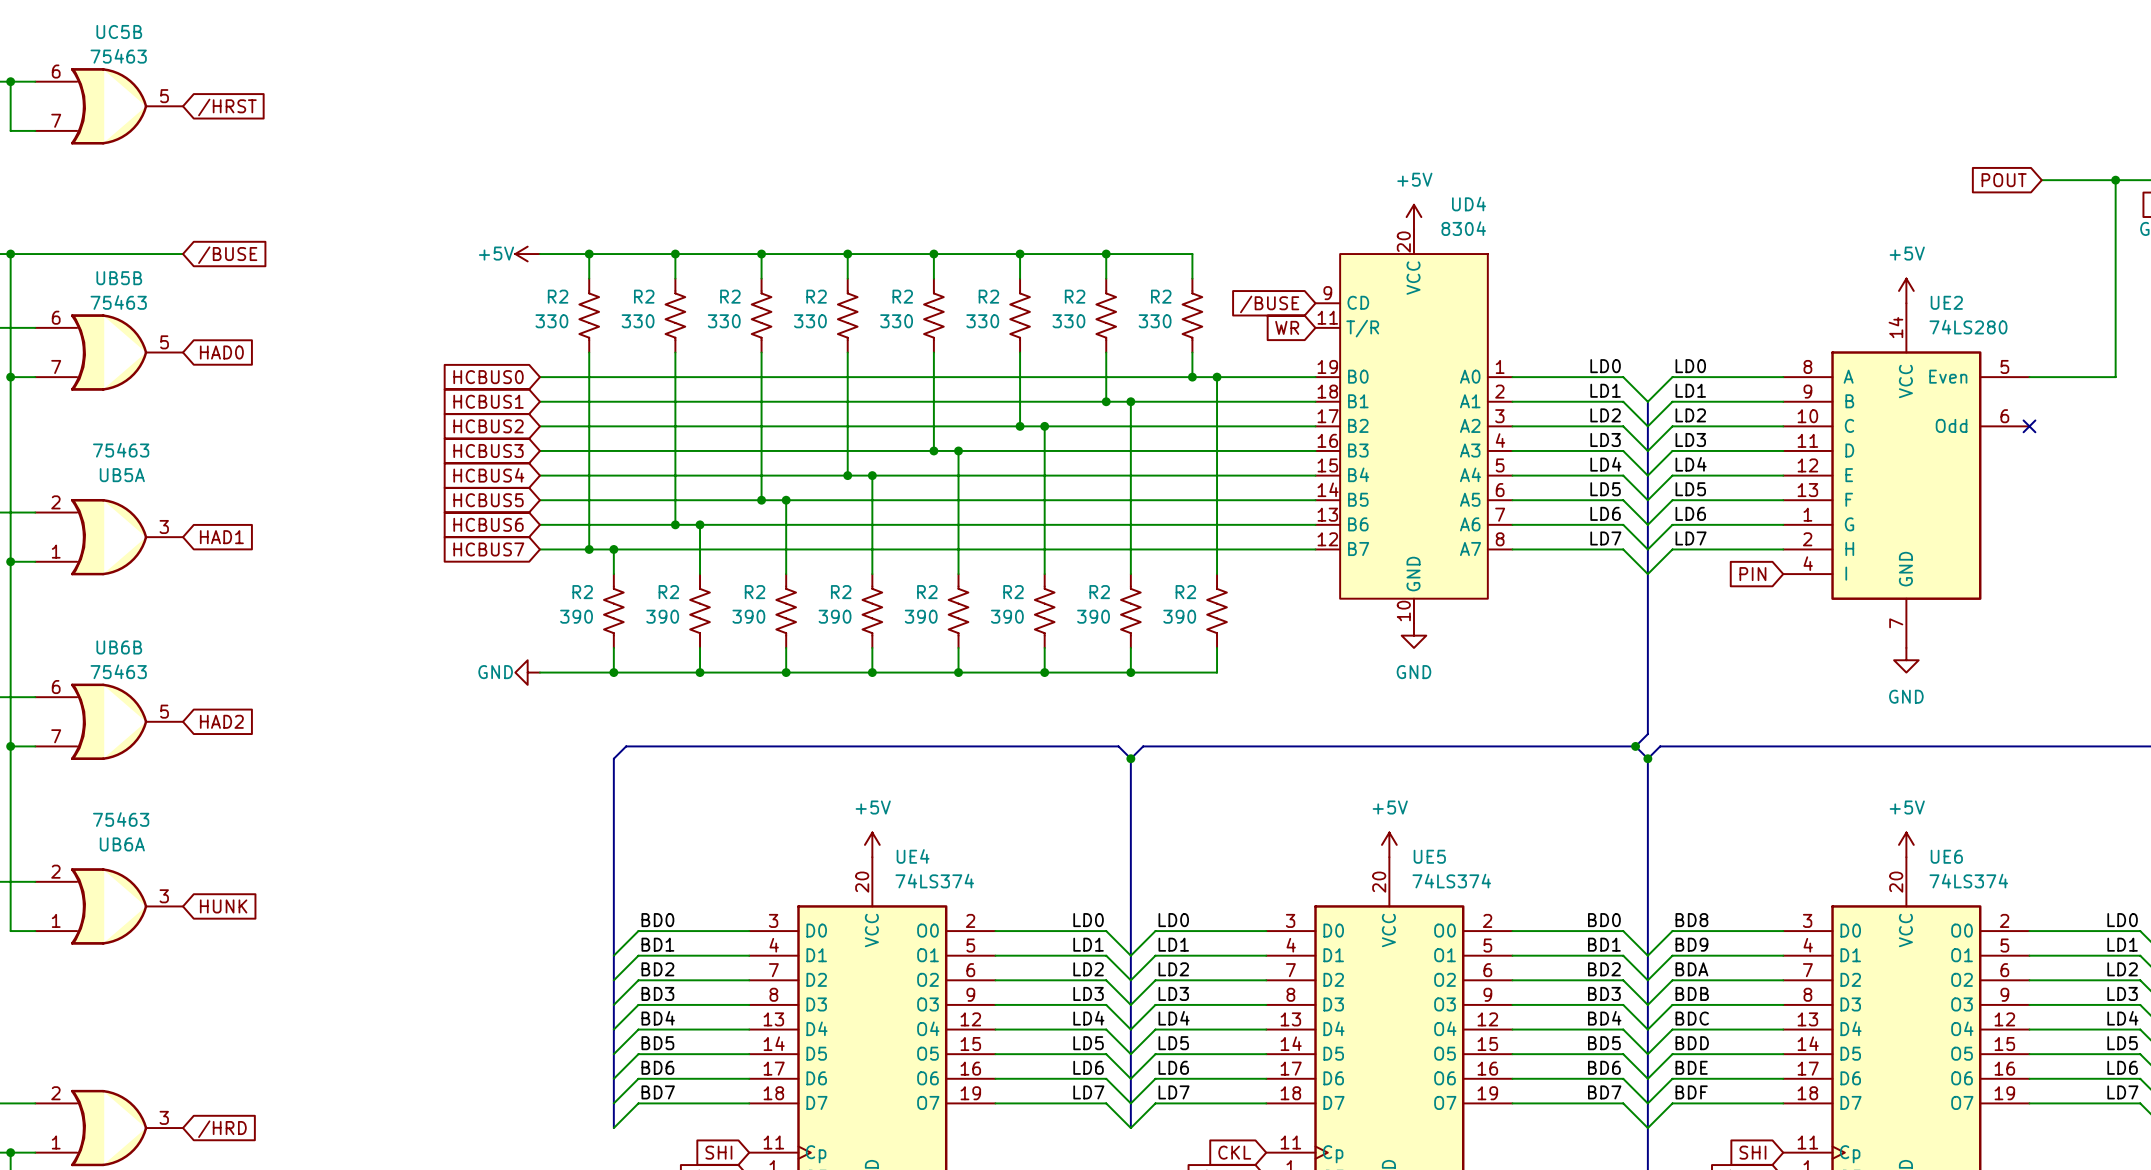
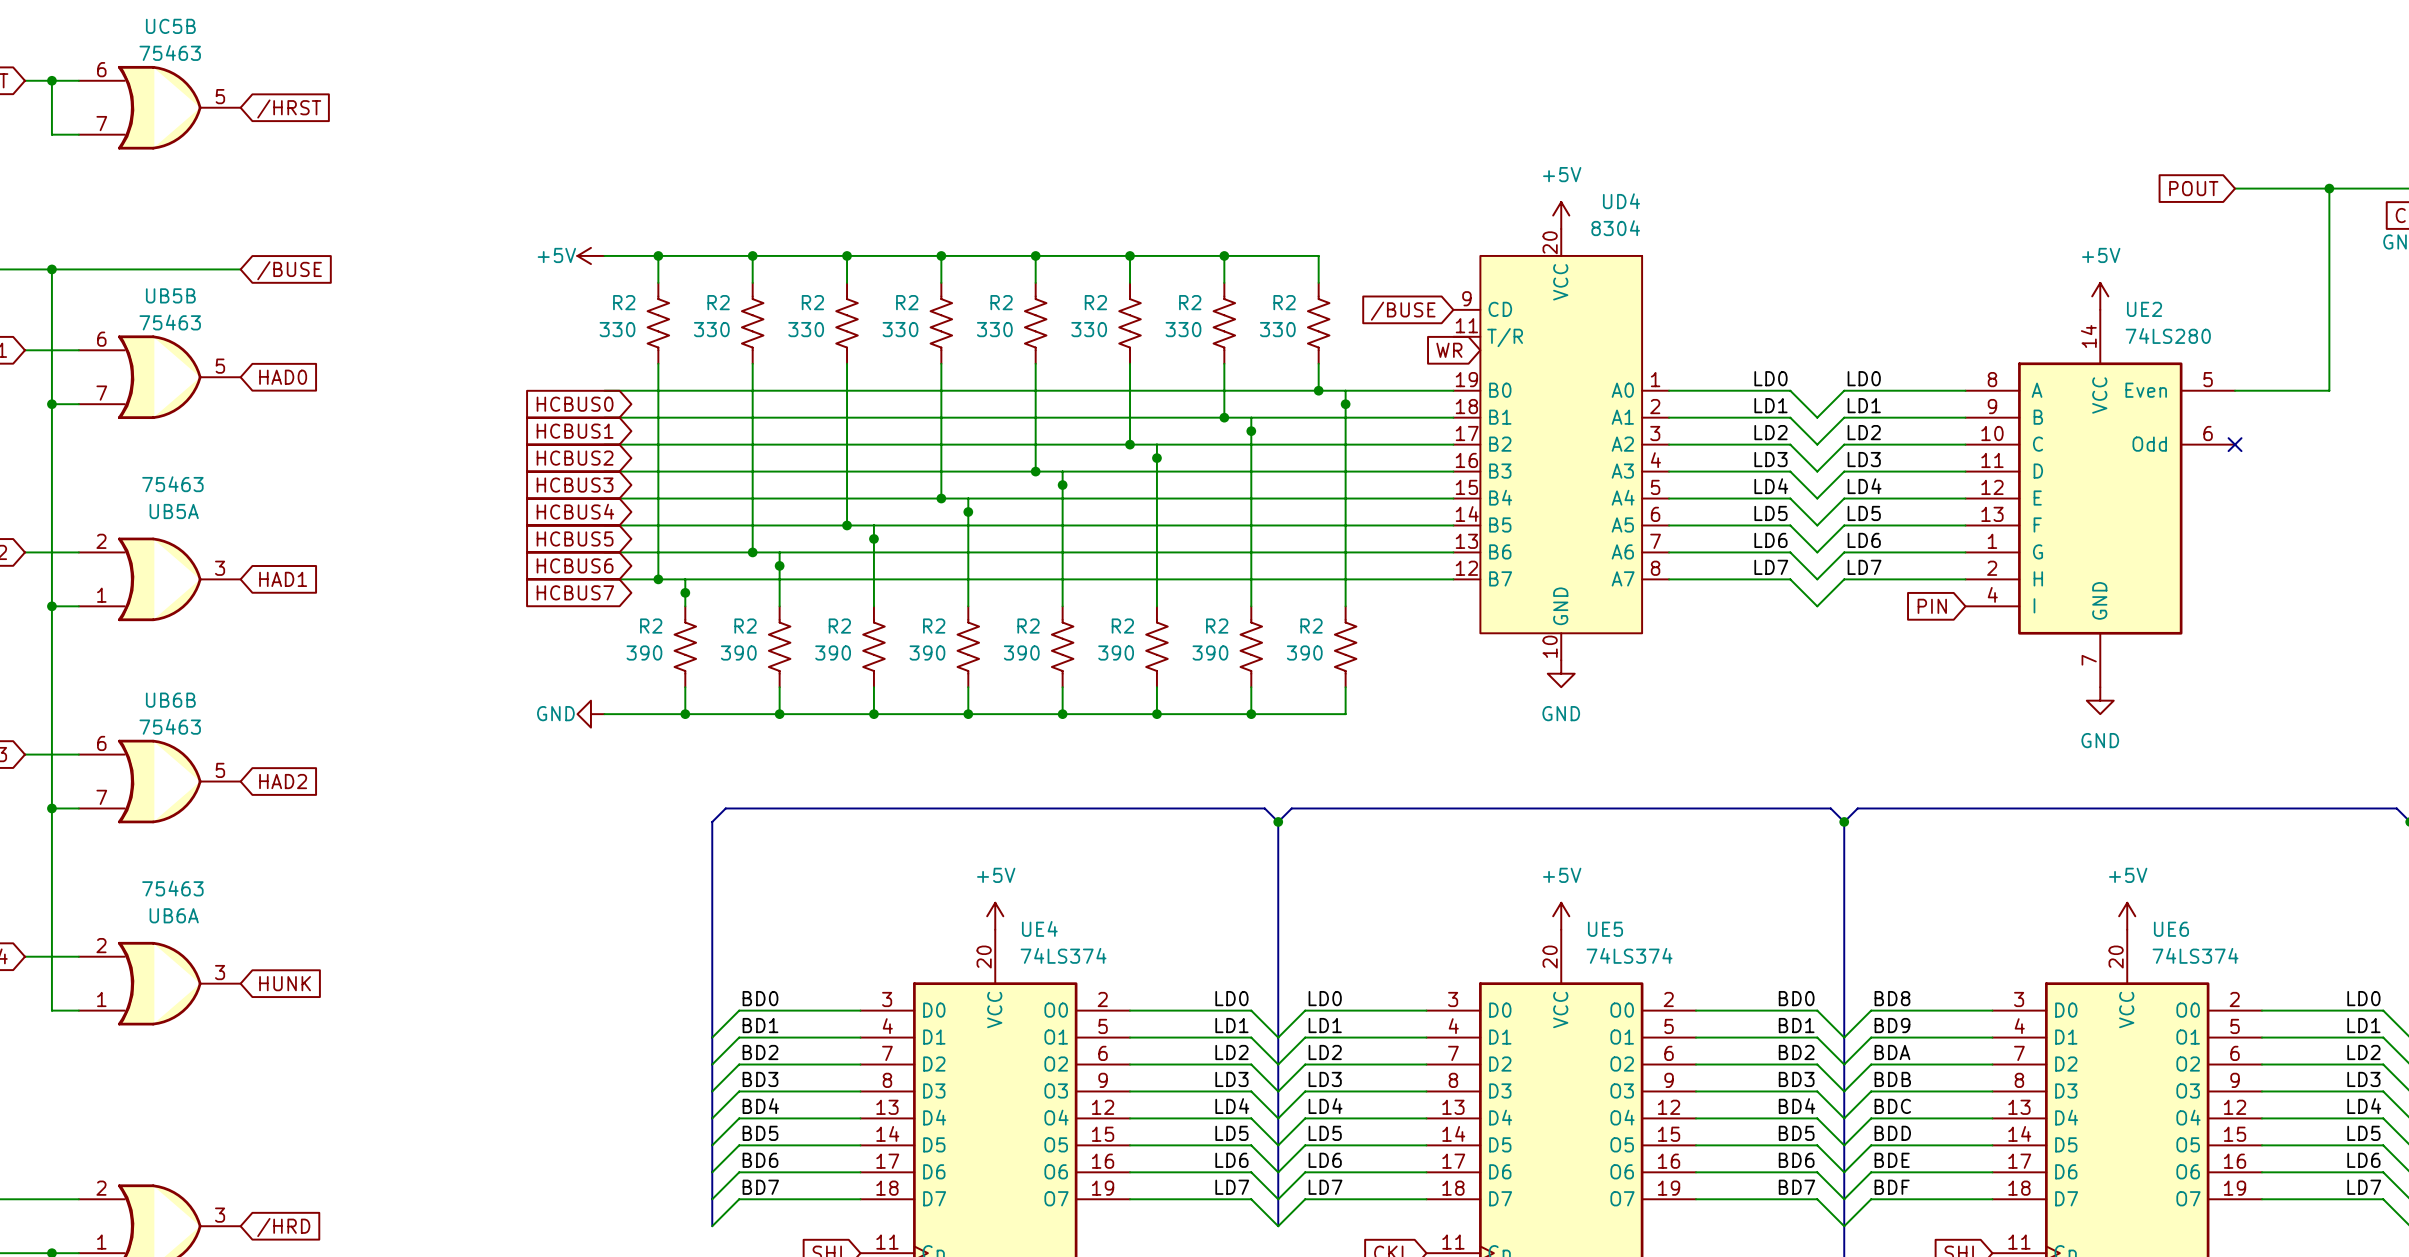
wire: none -> (2235, 188) (2275, 188)
global label position: POUT (2004, 180) -> POUT (2193, 188)
wire: none -> (2329, 188) (2329, 390) (2235, 390)
wire: (2115, 180) (2115, 377) (2029, 377) -> none
junction position: (2115, 180) -> (2329, 188)
power symbol position: +5V (1413, 217) -> +5V (1561, 215)
power symbol position: +5V (527, 254) -> +5V (590, 255)
wire: (539, 254) (1192, 254) (1192, 278) -> (604, 255) (1318, 255) (1318, 282)
wire: (589, 254) (589, 278) -> (658, 255) (658, 282)
junction position: (589, 254) -> (658, 255)
wire: (675, 254) (675, 278) -> (752, 255) (752, 282)
junction position: (675, 254) -> (752, 255)
wire: (761, 254) (761, 278) -> (847, 255) (847, 282)
junction position: (761, 254) -> (847, 255)
wire: (847, 254) (847, 278) -> (941, 255) (941, 282)
junction position: (847, 254) -> (941, 255)
wire: (933, 254) (933, 278) -> (1035, 255) (1035, 282)
junction position: (933, 254) -> (1035, 255)
wire: (1020, 254) (1020, 278) -> (1130, 255) (1130, 282)
junction position: (1020, 254) -> (1130, 255)
wire: (1106, 254) (1106, 278) -> (1224, 255) (1224, 282)
junction position: (1106, 254) -> (1224, 255)
power symbol position: +5V (1906, 290) -> +5V (2100, 296)
global label position: /BUSE (1269, 304) -> /BUSE (1403, 311)
R2 position: (589, 315) -> (658, 323)
R2 position: (675, 315) -> (752, 323)
R2 position: (761, 315) -> (847, 323)
R2 position: (847, 315) -> (941, 323)
R2 position: (933, 315) -> (1035, 323)
R2 position: (1020, 315) -> (1130, 323)
R2 position: (1106, 315) -> (1224, 323)
R2 position: (1192, 315) -> (1318, 323)
wire: none -> (658, 363) (658, 579)
wire: none -> (752, 363) (752, 552)
wire: none -> (847, 363) (847, 525)
wire: none -> (1130, 363) (1130, 444)
wire: none -> (1224, 363) (1224, 417)
wire: none -> (1318, 363) (1318, 390)
wire: (589, 352) (589, 537) -> none
wire: (675, 352) (675, 512) -> none
wire: (761, 352) (761, 487) -> none
wire: (847, 352) (847, 463) -> (1062, 485) (1062, 606)
wire: (933, 352) (933, 438) -> (968, 512) (968, 606)
wire: (1020, 352) (1020, 414) -> none
wire: (1106, 352) (1106, 389) -> none
wire: (1192, 352) (1192, 364) -> none
label: none -> LD0 (1770, 378)
label: none -> LD0 (1864, 378)
junction: none -> (1318, 390)
label: LD0 (1605, 366) -> none
label: LD0 (1690, 366) -> none
wire: (539, 377) (1315, 377) -> (604, 390) (1453, 390)
wire: none -> (1345, 404) (1345, 606)
wire: (1217, 377) (1217, 574) -> none
junction: (1217, 377) -> none
wire: (1512, 377) (1623, 377) (1647, 401) (1672, 377) (1783, 377) -> (1669, 390) (1790, 390) (1817, 417) (1844, 390) (1965, 390)
label: none -> LD1 (1770, 405)
label: none -> LD1 (1864, 405)
junction: none -> (1224, 417)
label: LD1 (1605, 390) -> none
label: LD1 (1690, 390) -> none
wire: (539, 401) (1315, 401) -> (604, 417) (1453, 417)
wire: none -> (1251, 431) (1251, 606)
wire: (1130, 401) (1130, 574) -> none
junction: (1130, 401) -> none
wire: (1512, 401) (1623, 401) (1647, 426) (1672, 401) (1783, 401) -> (1669, 417) (1790, 417) (1817, 444) (1844, 417) (1965, 417)
bus: (1647, 401) (1647, 734) (1635, 746) -> none
label: none -> LD2 (1770, 432)
label: none -> LD2 (1864, 432)
junction: none -> (1130, 444)
label: LD2 (1605, 415) -> none
label: LD2 (1690, 415) -> none
wire: (539, 426) (1315, 426) -> (604, 444) (1453, 444)
wire: none -> (1156, 458) (1156, 606)
wire: (1044, 426) (1044, 574) -> none
junction: (1044, 426) -> none
UD4 position: (1413, 426) -> (1561, 444)
wire: (1512, 426) (1623, 426) (1647, 450) (1672, 426) (1783, 426) -> (1669, 444) (1790, 444) (1817, 471) (1844, 444) (1965, 444)
no-connect mark position: (2029, 426) -> (2235, 444)
label: none -> LD3 (1770, 459)
label: none -> LD3 (1864, 459)
junction: none -> (1035, 471)
label: LD3 (1605, 440) -> none
label: LD3 (1690, 440) -> none
wire: (539, 450) (1315, 450) -> (604, 471) (1453, 471)
wire: (958, 450) (958, 574) -> (941, 363) (941, 498)
junction: (958, 450) -> none
wire: (1512, 450) (1623, 450) (1647, 475) (1672, 450) (1783, 450) -> (1669, 471) (1790, 471) (1817, 498) (1844, 471) (1965, 471)
label: none -> LD4 (1771, 486)
label: none -> LD4 (1864, 486)
junction: none -> (941, 498)
label: LD4 (1605, 464) -> none
label: LD4 (1691, 464) -> none
wire: (539, 475) (1315, 475) -> (604, 498) (1453, 498)
wire: (872, 475) (872, 574) -> (1035, 363) (1035, 471)
junction: (872, 475) -> none
wire: (1512, 475) (1623, 475) (1647, 500) (1672, 475) (1783, 475) -> (1669, 498) (1790, 498) (1817, 525) (1844, 498) (1965, 498)
UE2 position: (1906, 475) -> (2100, 498)
label: none -> LD5 (1770, 513)
label: none -> LD5 (1864, 513)
junction: none -> (847, 525)
label: LD5 (1605, 489) -> none
label: LD5 (1690, 489) -> none
wire: (539, 500) (1315, 500) -> (604, 525) (1453, 525)
wire: none -> (873, 538) (873, 606)
wire: (786, 500) (786, 574) -> none
junction: (786, 500) -> none
wire: (1512, 500) (1623, 500) (1647, 524) (1672, 500) (1783, 500) -> (1669, 525) (1790, 525) (1817, 552) (1844, 525) (1965, 525)
label: none -> LD6 (1770, 540)
label: none -> LD6 (1864, 540)
junction: none -> (752, 552)
label: LD6 (1605, 513) -> none
label: LD6 (1690, 513) -> none
wire: (539, 524) (1315, 524) -> (604, 552) (1453, 552)
wire: none -> (779, 565) (779, 606)
wire: (700, 524) (700, 574) -> none
junction: (700, 524) -> none
wire: (1512, 524) (1623, 524) (1647, 549) (1672, 524) (1783, 524) -> (1669, 552) (1790, 552) (1817, 579) (1844, 552) (1965, 552)
label: none -> LD7 (1771, 567)
label: none -> LD7 (1864, 567)
junction: none -> (658, 579)
label: LD7 (1605, 538) -> none
label: LD7 (1691, 538) -> none
wire: (539, 549) (1315, 549) -> (604, 579) (1453, 579)
wire: none -> (685, 592) (685, 606)
wire: (613, 549) (613, 574) -> none
junction: (613, 549) -> none
wire: (1512, 549) (1623, 549) (1647, 574) (1672, 549) (1783, 549) -> (1669, 579) (1790, 579) (1817, 606) (1844, 579) (1965, 579)
global label position: PIN (1752, 574) -> PIN (1932, 606)
R2 position: (613, 611) -> (685, 646)
R2 position: (700, 611) -> (779, 646)
R2 position: (786, 611) -> (873, 646)
R2 position: (872, 611) -> (968, 646)
R2 position: (958, 611) -> (1062, 646)
R2 position: (1044, 611) -> (1156, 646)
R2 position: (1130, 611) -> (1251, 646)
R2 position: (1217, 611) -> (1345, 646)
power symbol position: GND (1413, 635) -> GND (1561, 673)
wire: (613, 647) (613, 672) -> (685, 687) (685, 714)
wire: (700, 647) (700, 672) -> (779, 687) (779, 714)
wire: (786, 647) (786, 672) -> (873, 687) (873, 714)
wire: (872, 647) (872, 672) -> (968, 687) (968, 714)
wire: (958, 647) (958, 672) -> (1062, 687) (1062, 714)
wire: (1044, 647) (1044, 672) -> (1156, 687) (1156, 714)
wire: (1130, 647) (1130, 672) -> (1251, 687) (1251, 714)
wire: (1217, 647) (1217, 672) (539, 672) -> (1345, 687) (1345, 714) (604, 714)
power symbol position: GND (1906, 660) -> GND (2100, 700)
power symbol position: GND (527, 672) -> GND (590, 714)
junction position: (613, 672) -> (685, 714)
junction position: (700, 672) -> (779, 714)
junction position: (786, 672) -> (873, 714)
junction position: (872, 672) -> (968, 714)
junction position: (958, 672) -> (1062, 714)
junction position: (1044, 672) -> (1156, 714)
junction position: (1130, 672) -> (1251, 714)
junction: (1635, 746) -> none

